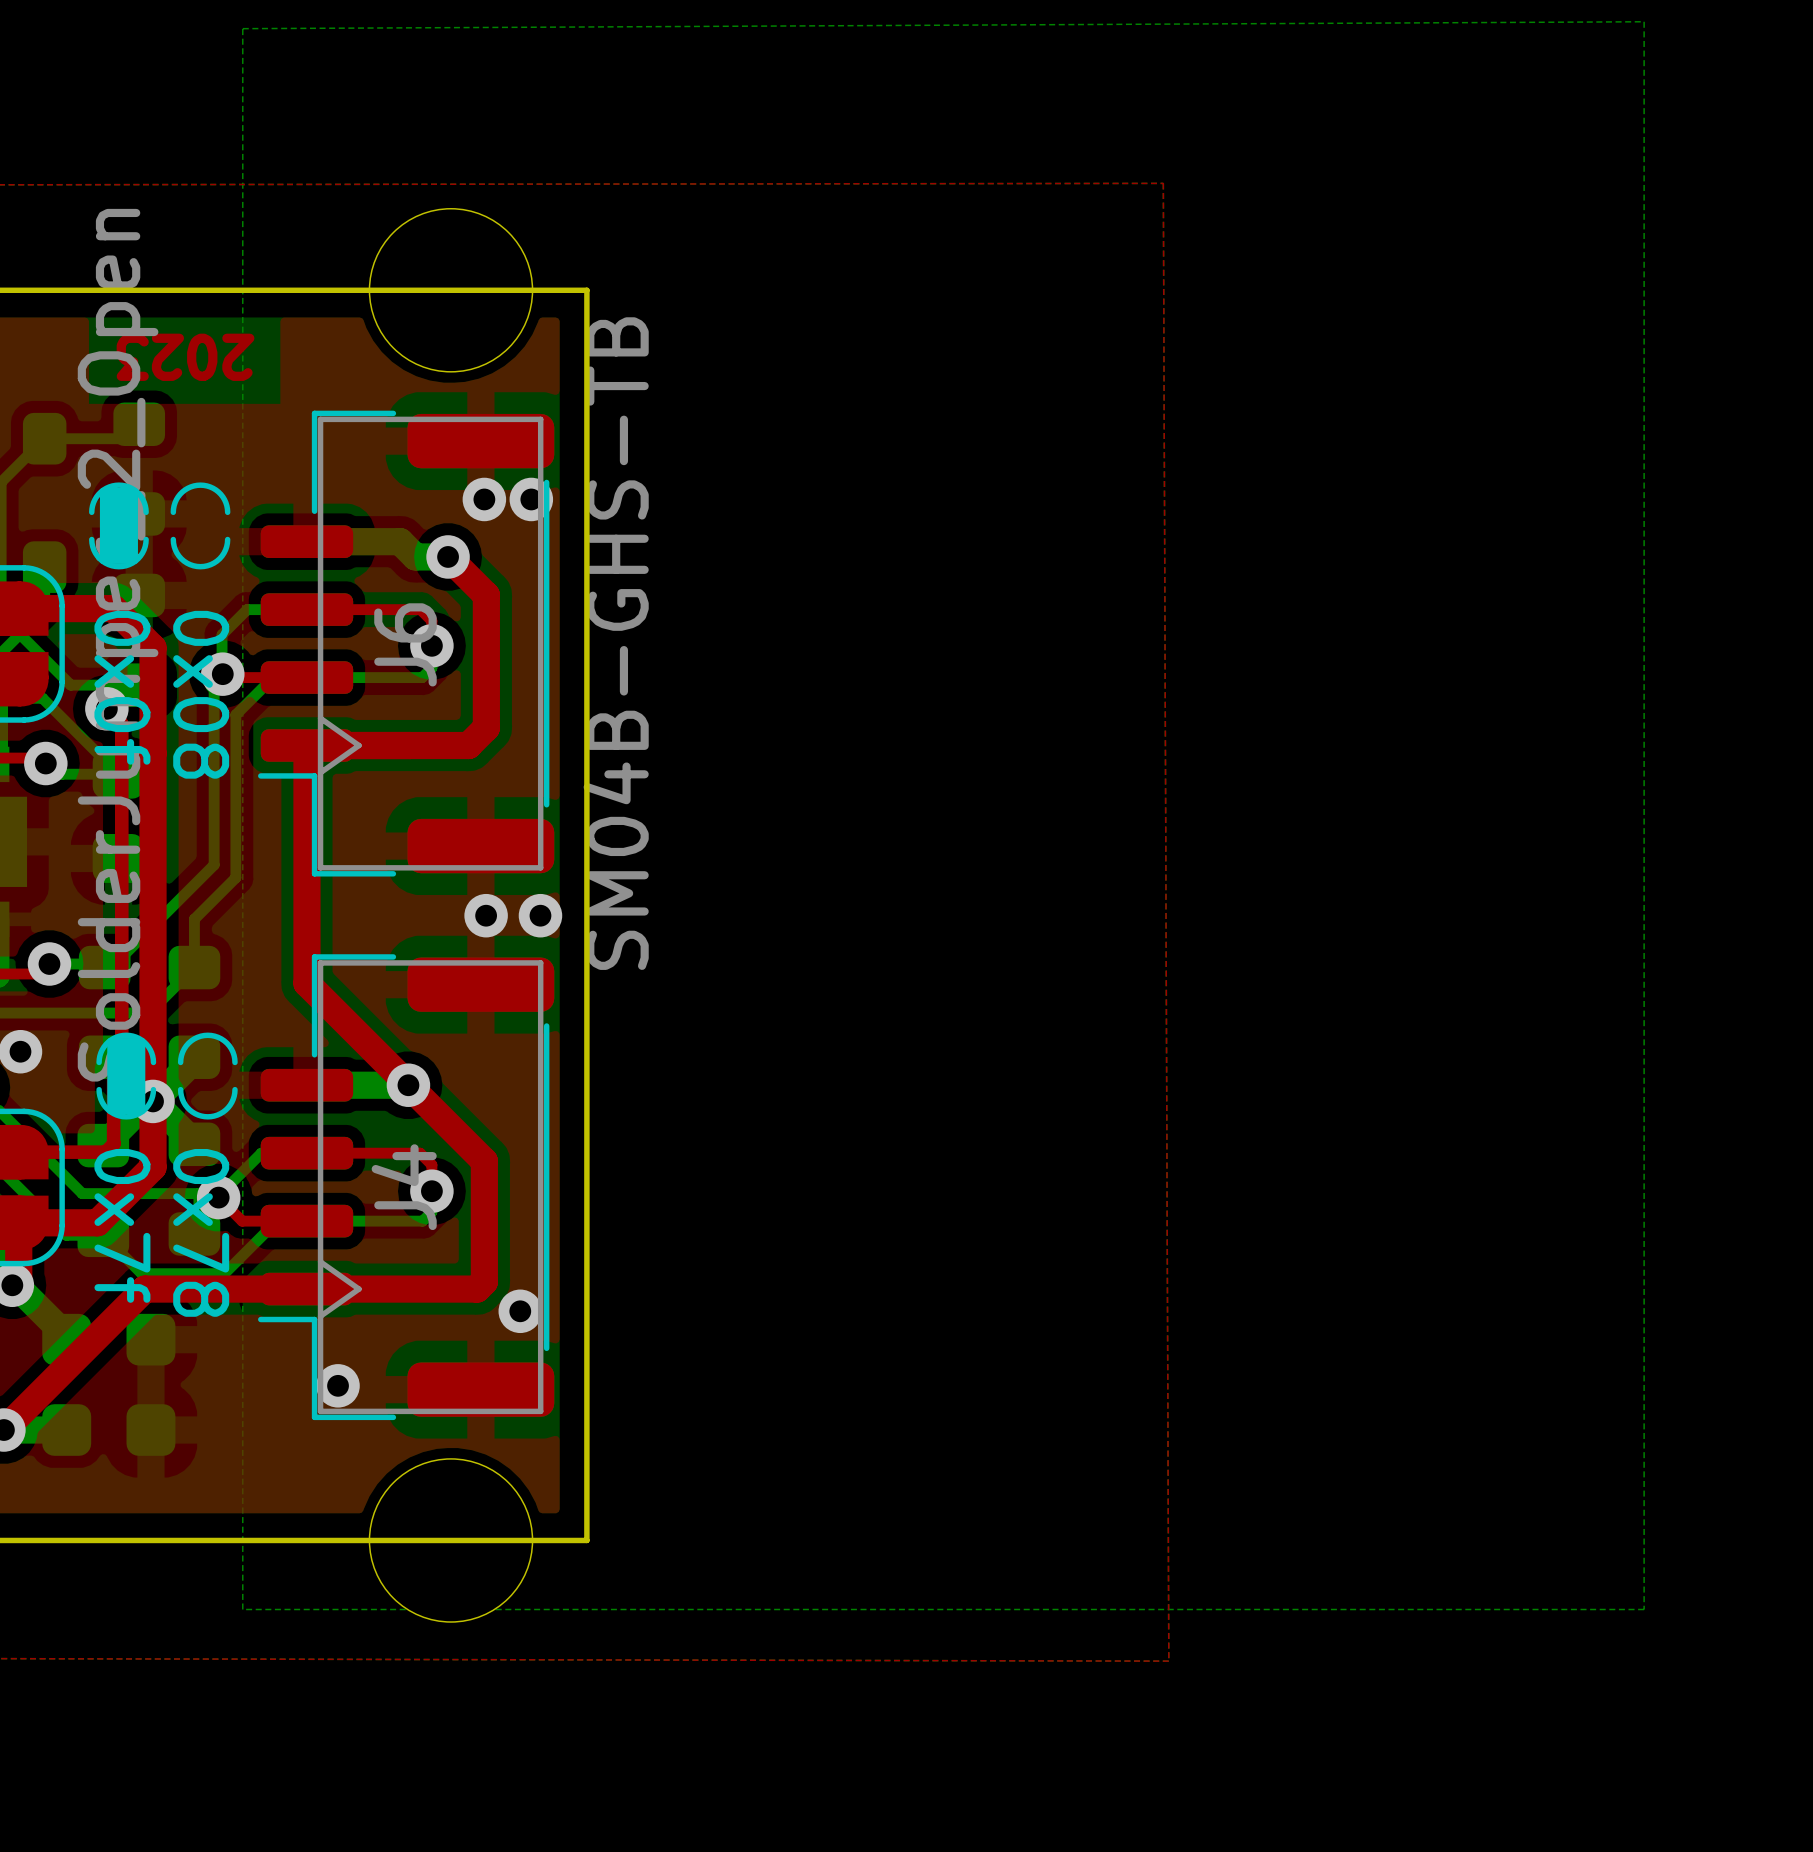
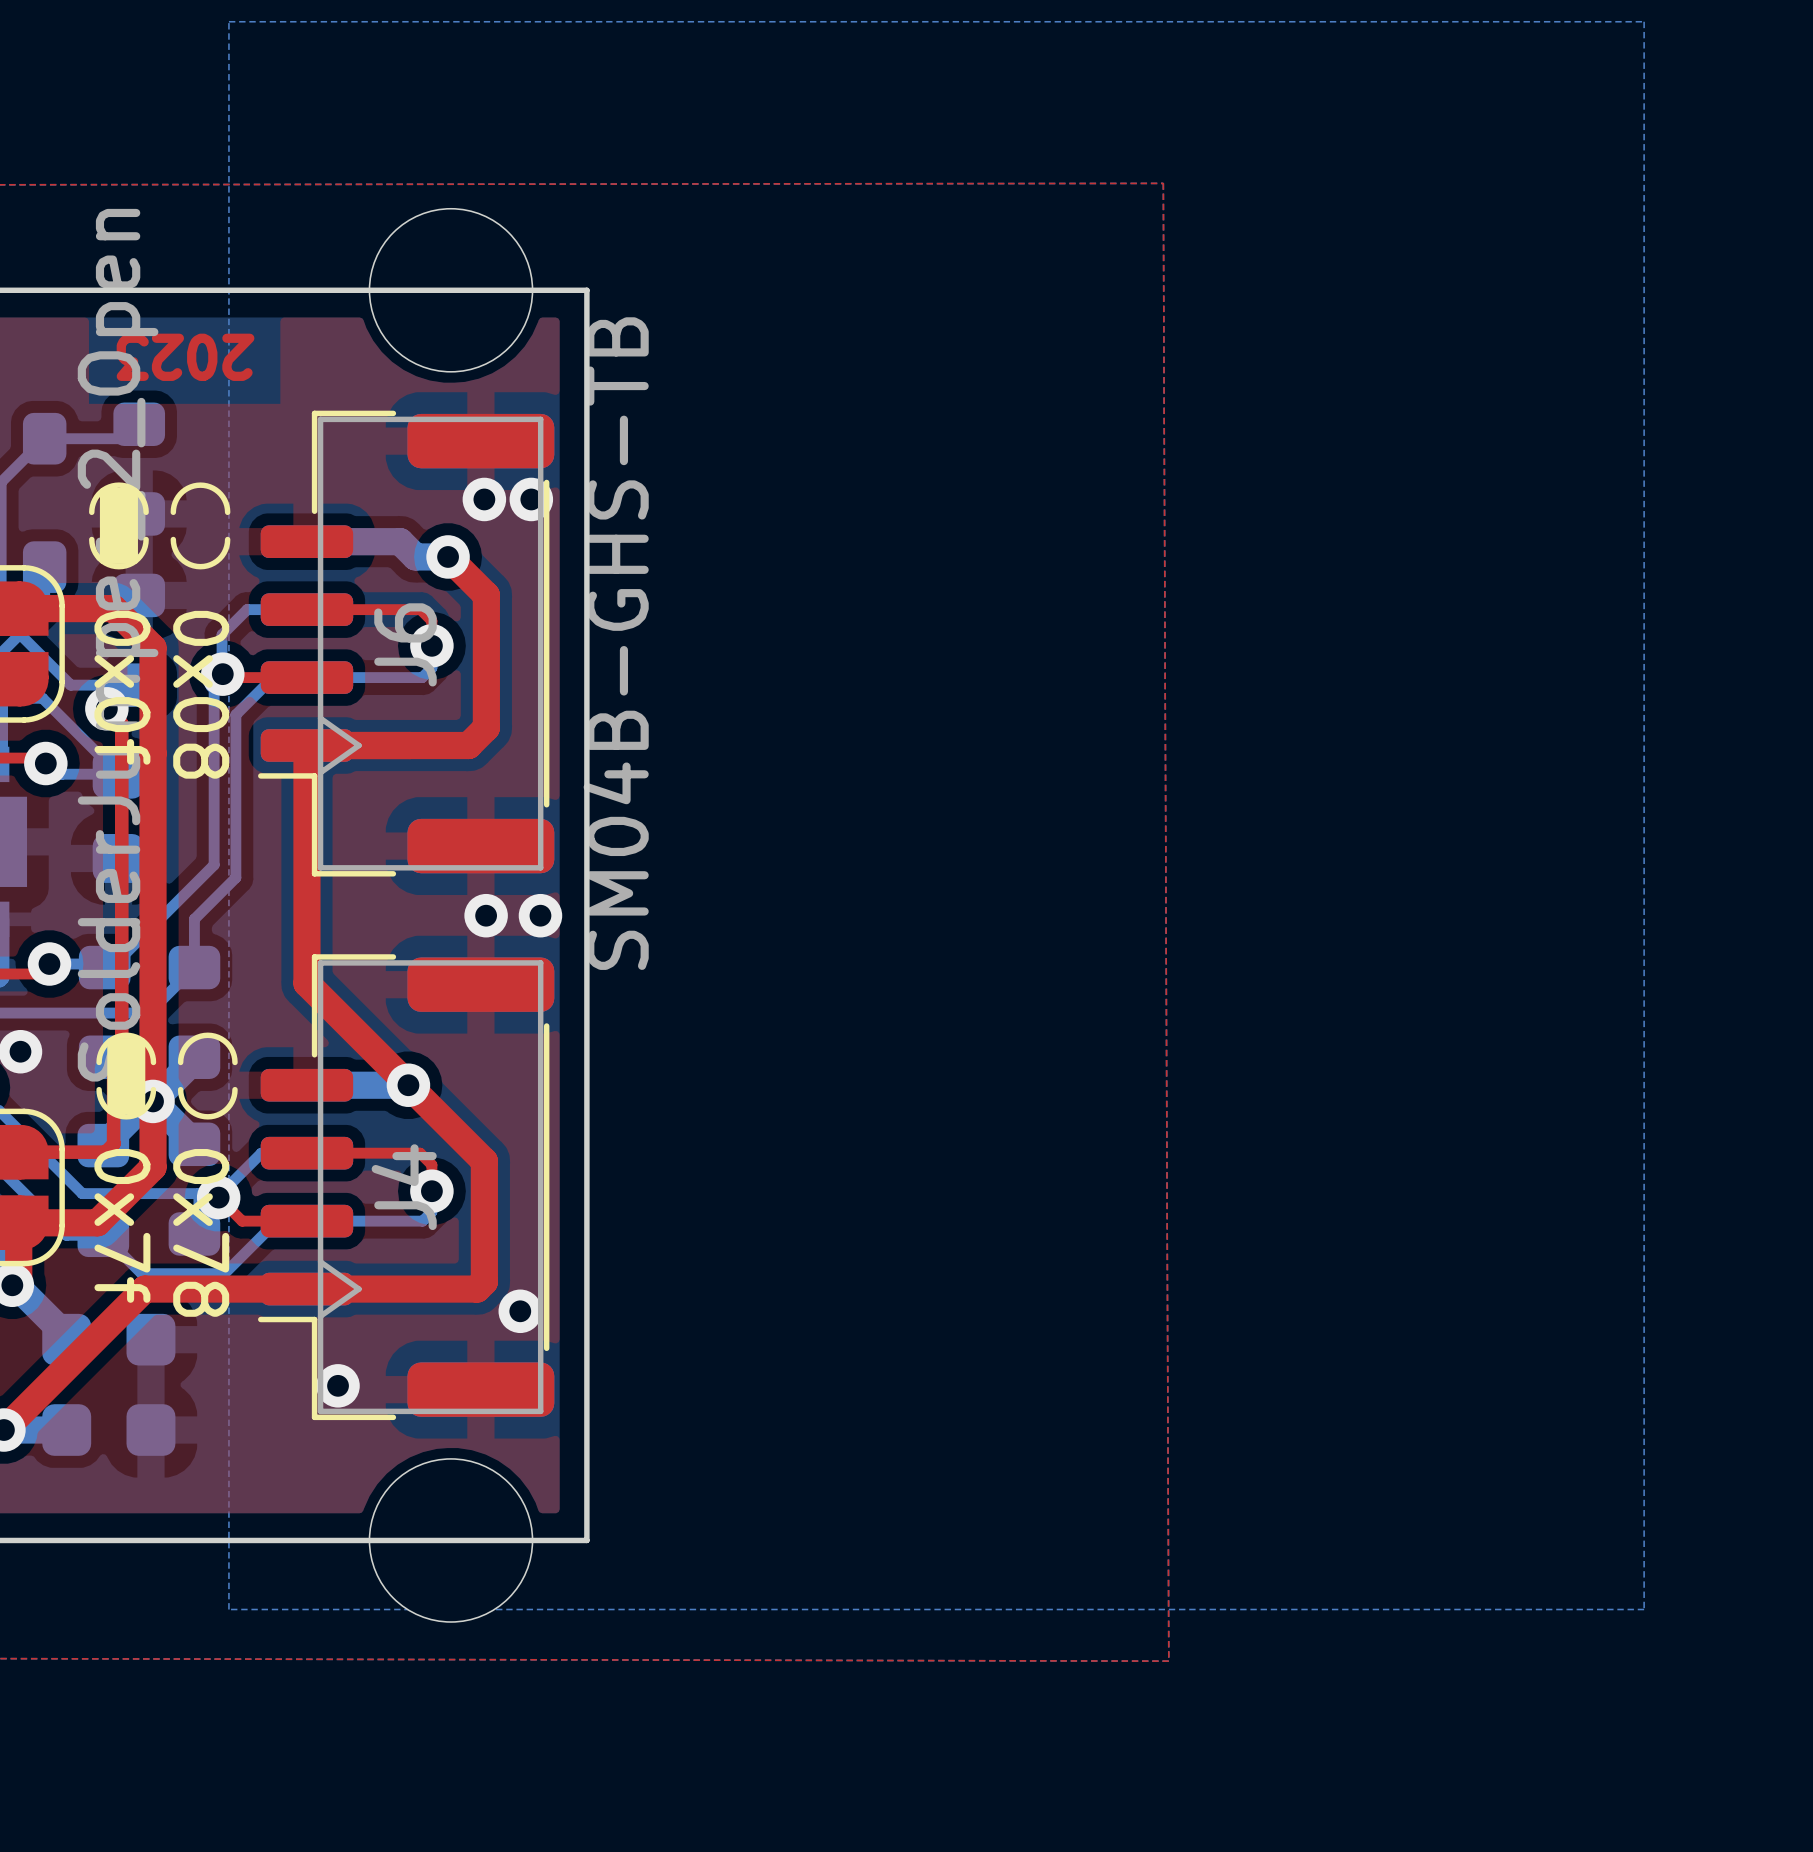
bottom zone outline: (1644, 21) (242, 28) (242, 1609) -> (1644, 21) (228, 21) (228, 1609) (242, 1609)

